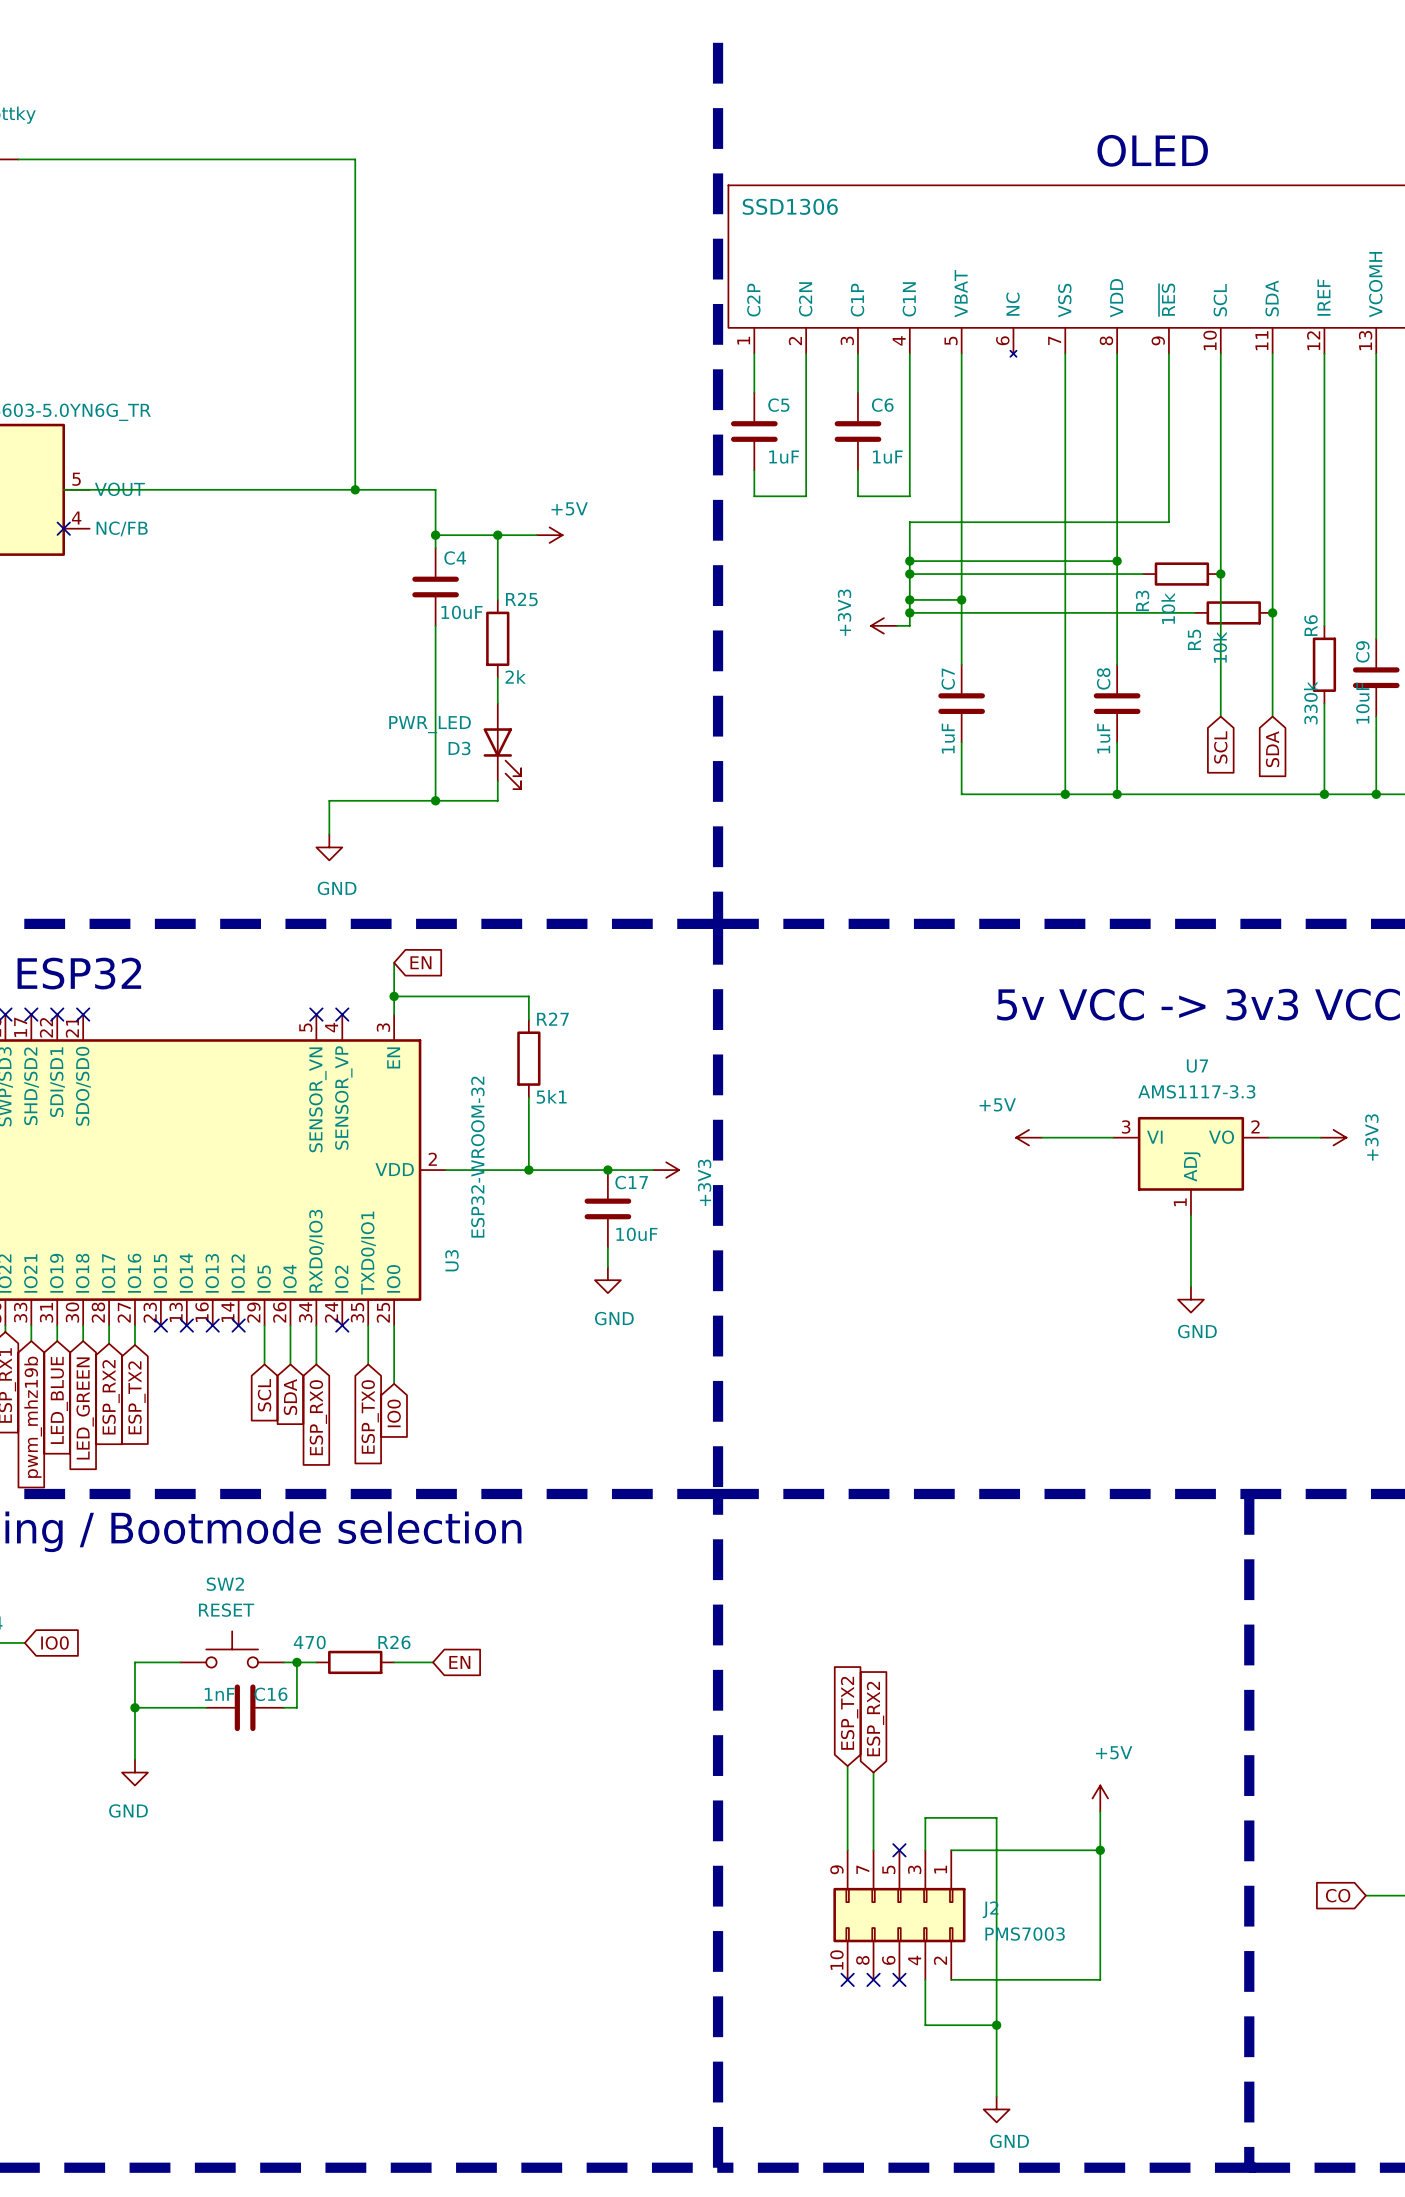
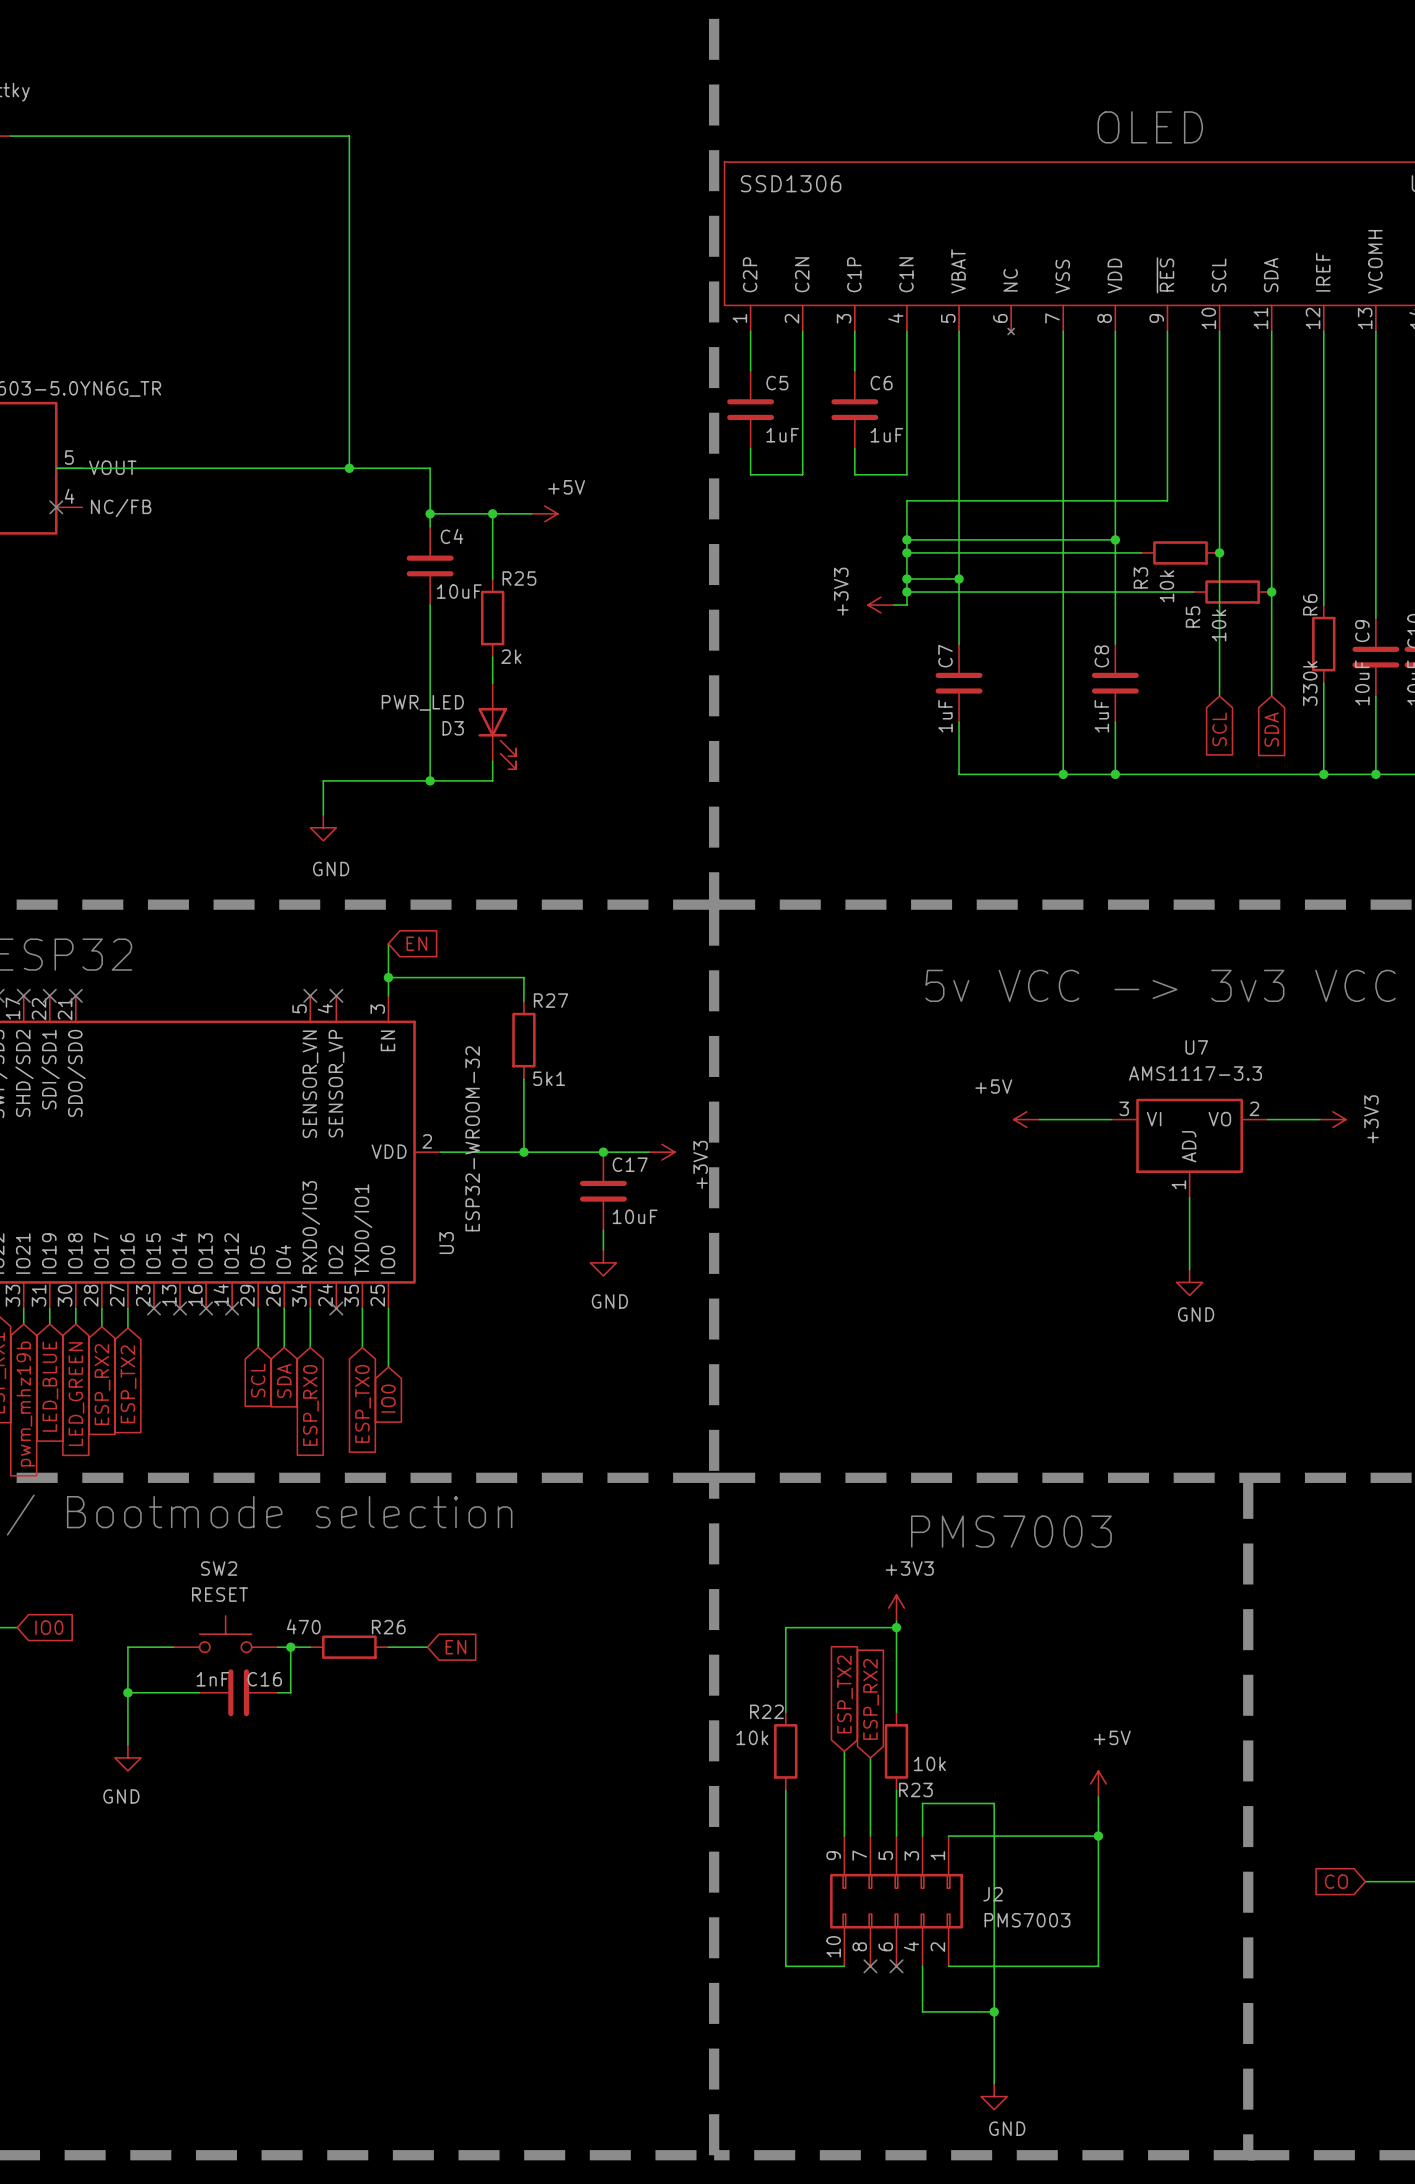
text: none -> PMS7003 (1011, 1531)
power symbol: none -> +3V3 (896, 1608)
wire: none -> (896, 1621) (896, 1712)
wire: none -> (896, 1627) (785, 1627) (785, 1712)
junction: none -> (896, 1627)
R22: none -> 10k (785, 1751)
R23: none -> 10k (896, 1751)
wire: none -> (785, 1790) (785, 1966) (844, 1966)
wire: none -> (896, 1790) (896, 1836)
no-connect mark: (899, 1850) -> none
no-connect mark: (847, 1979) -> none

